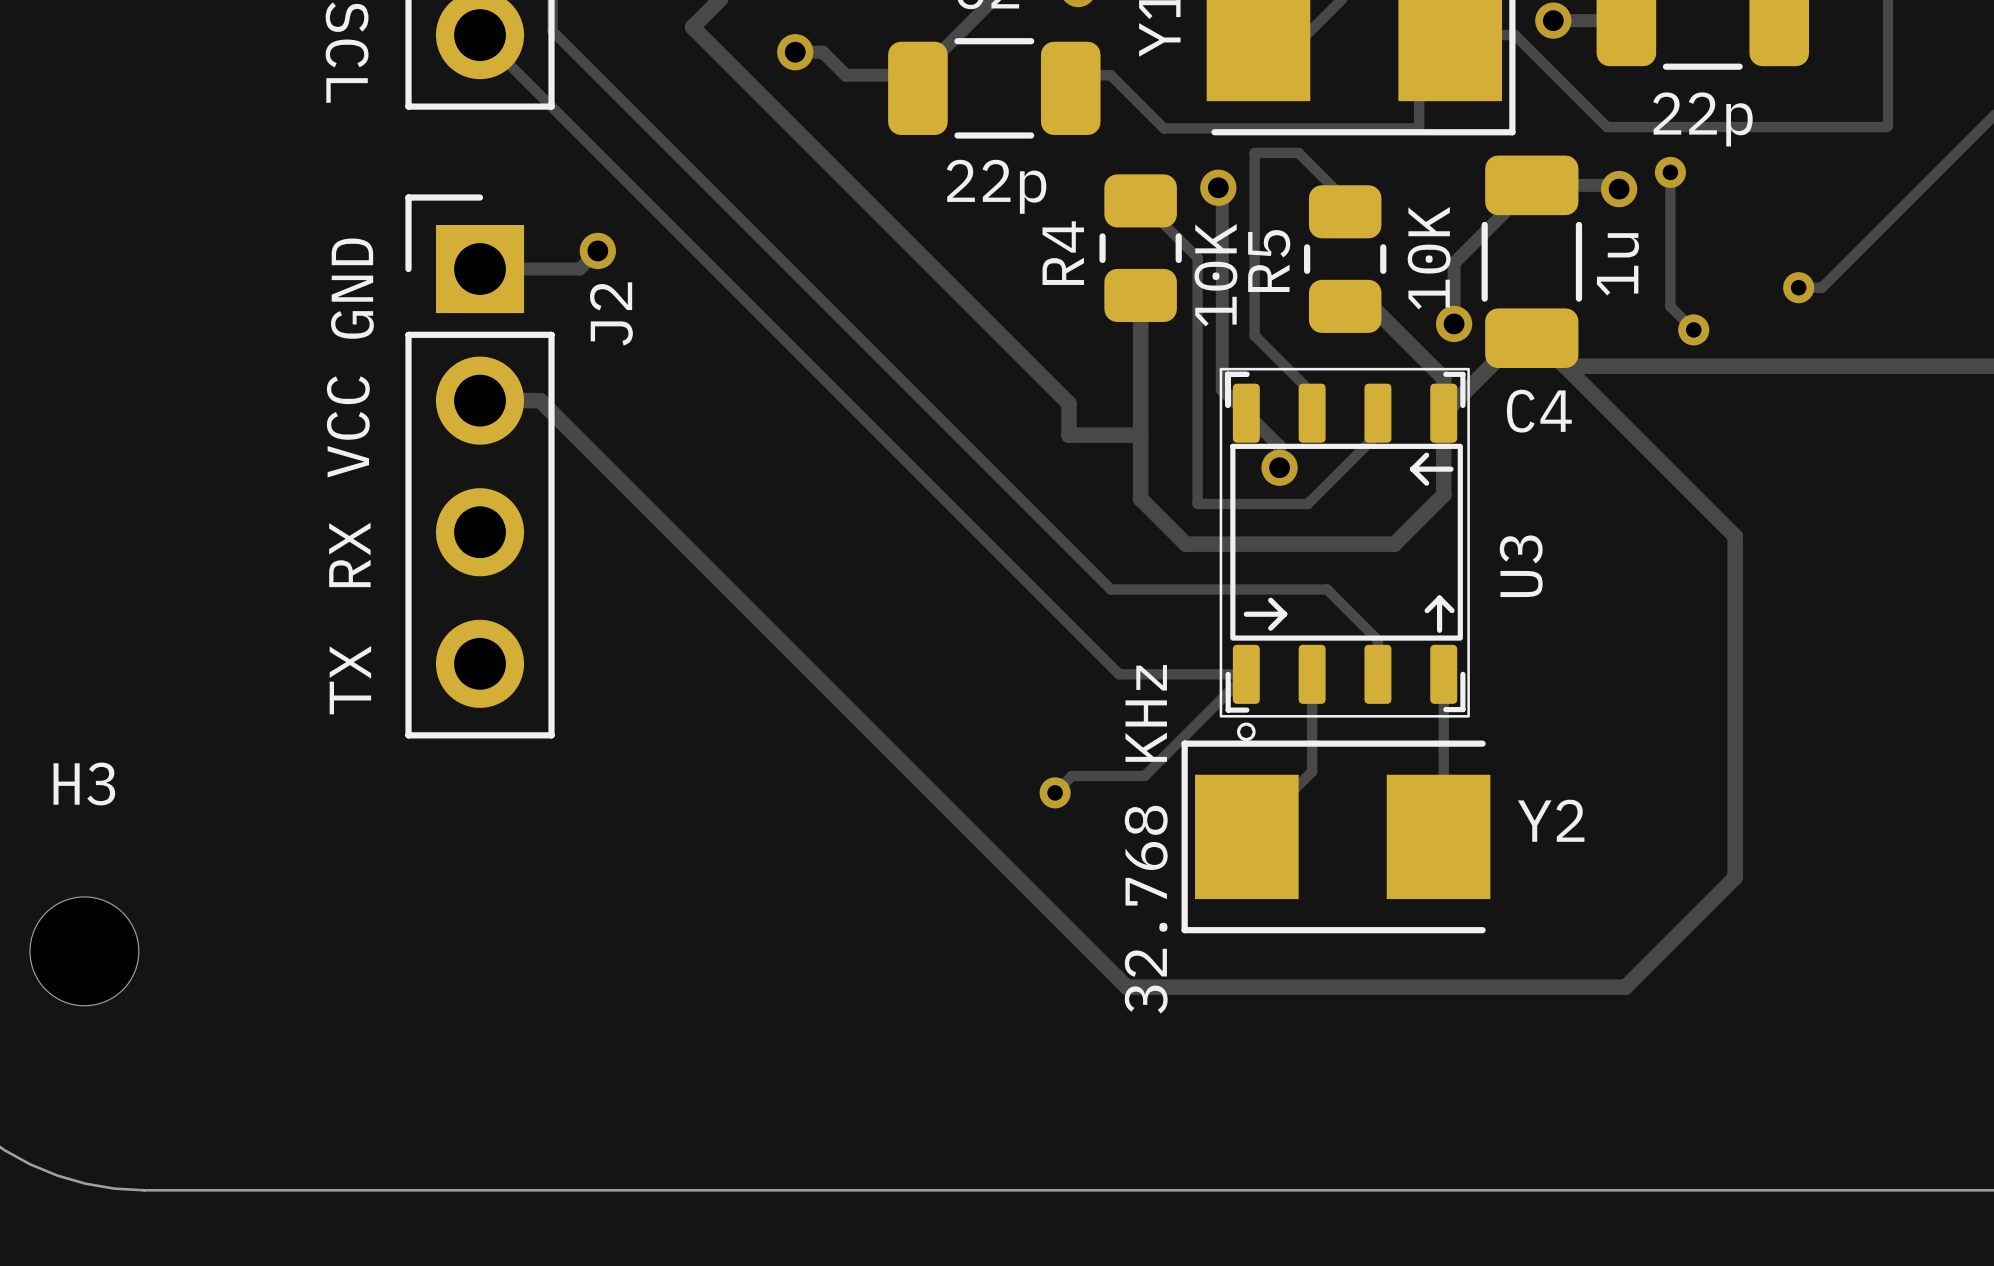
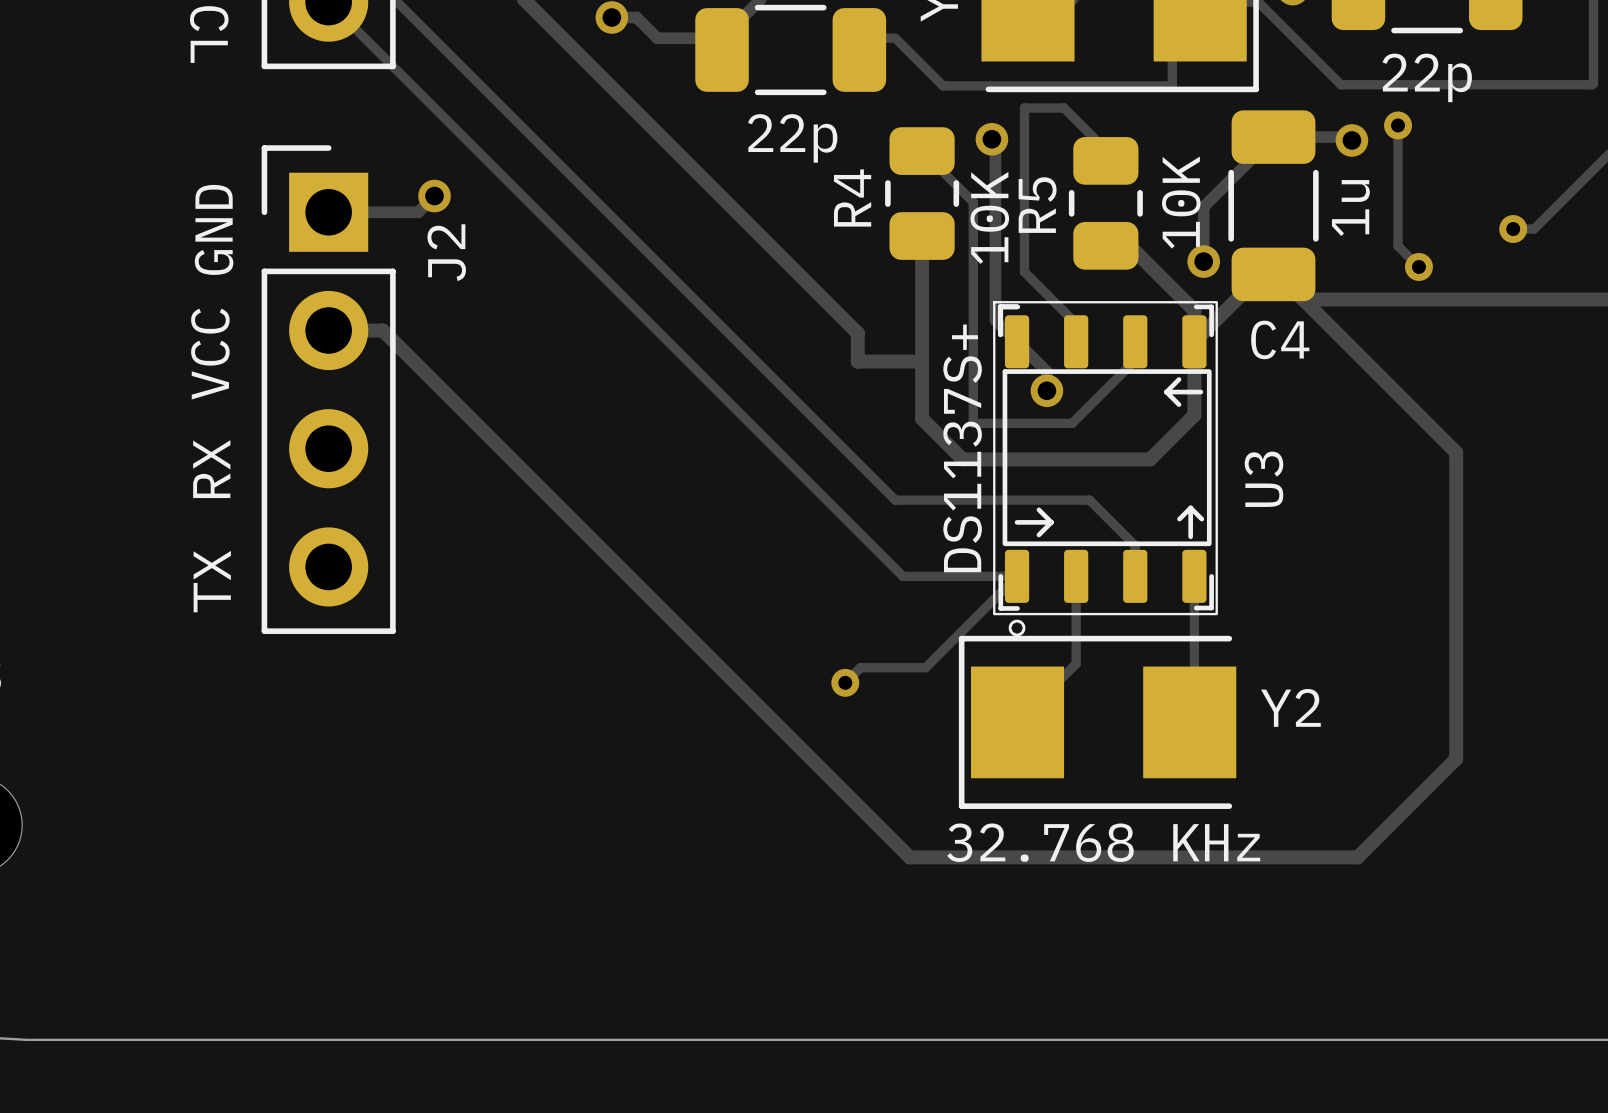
U3 value: none -> DS1137S+ (962, 448)
Y2 value rotation: 0° (1146, 839) -> 90° clockwise (1103, 842)

